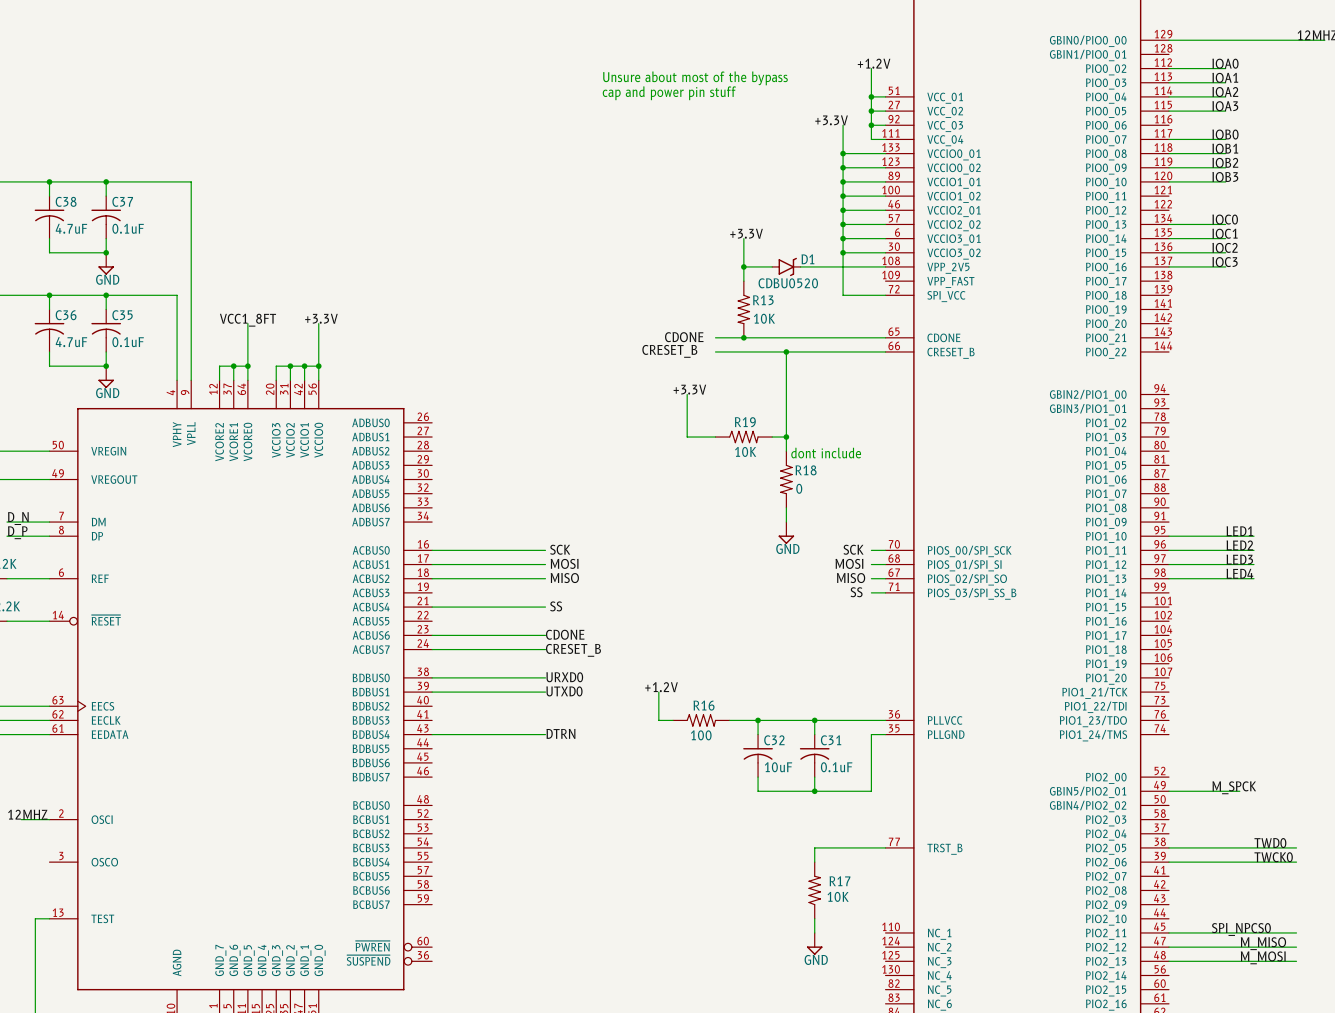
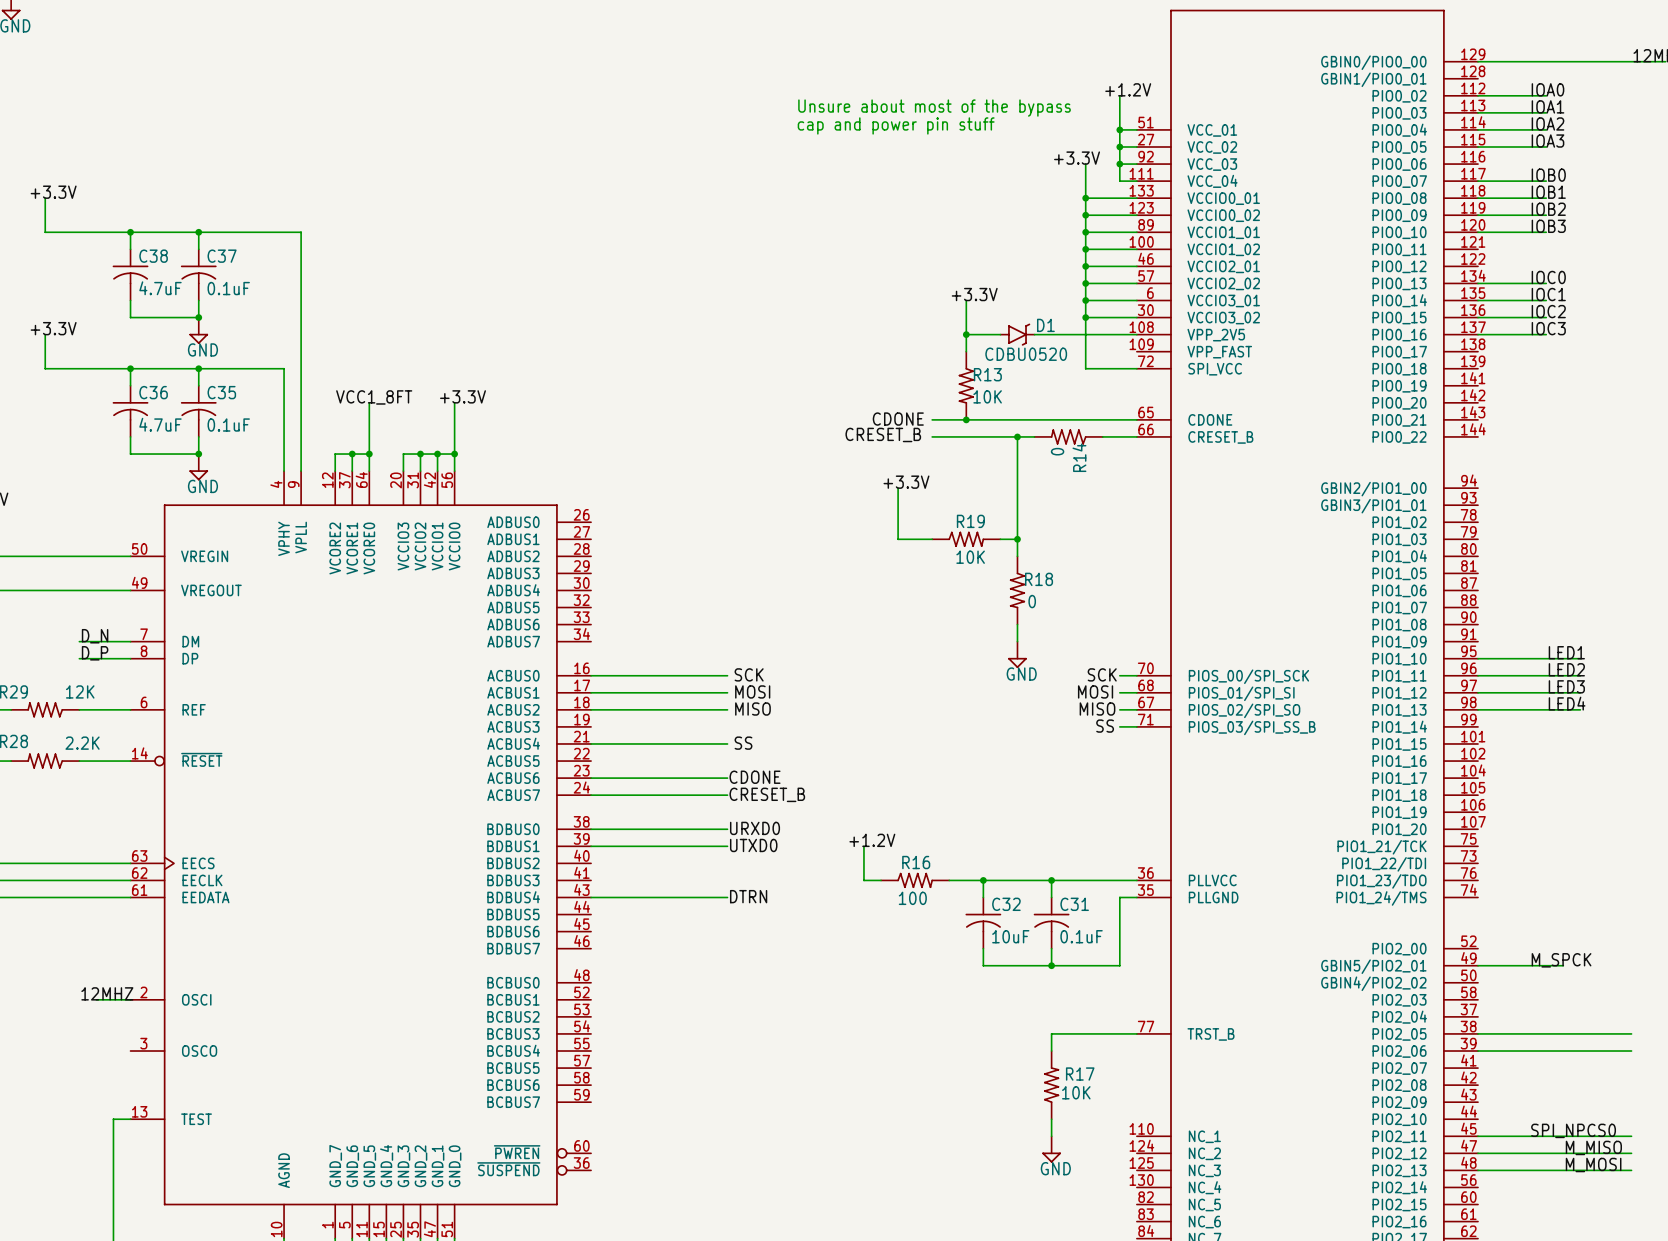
R14: none -> 0 (1068, 436)
text: dont include (826, 453) -> none
label: TWD0 (1270, 843) -> none
label: TWCK0 (1273, 857) -> none

